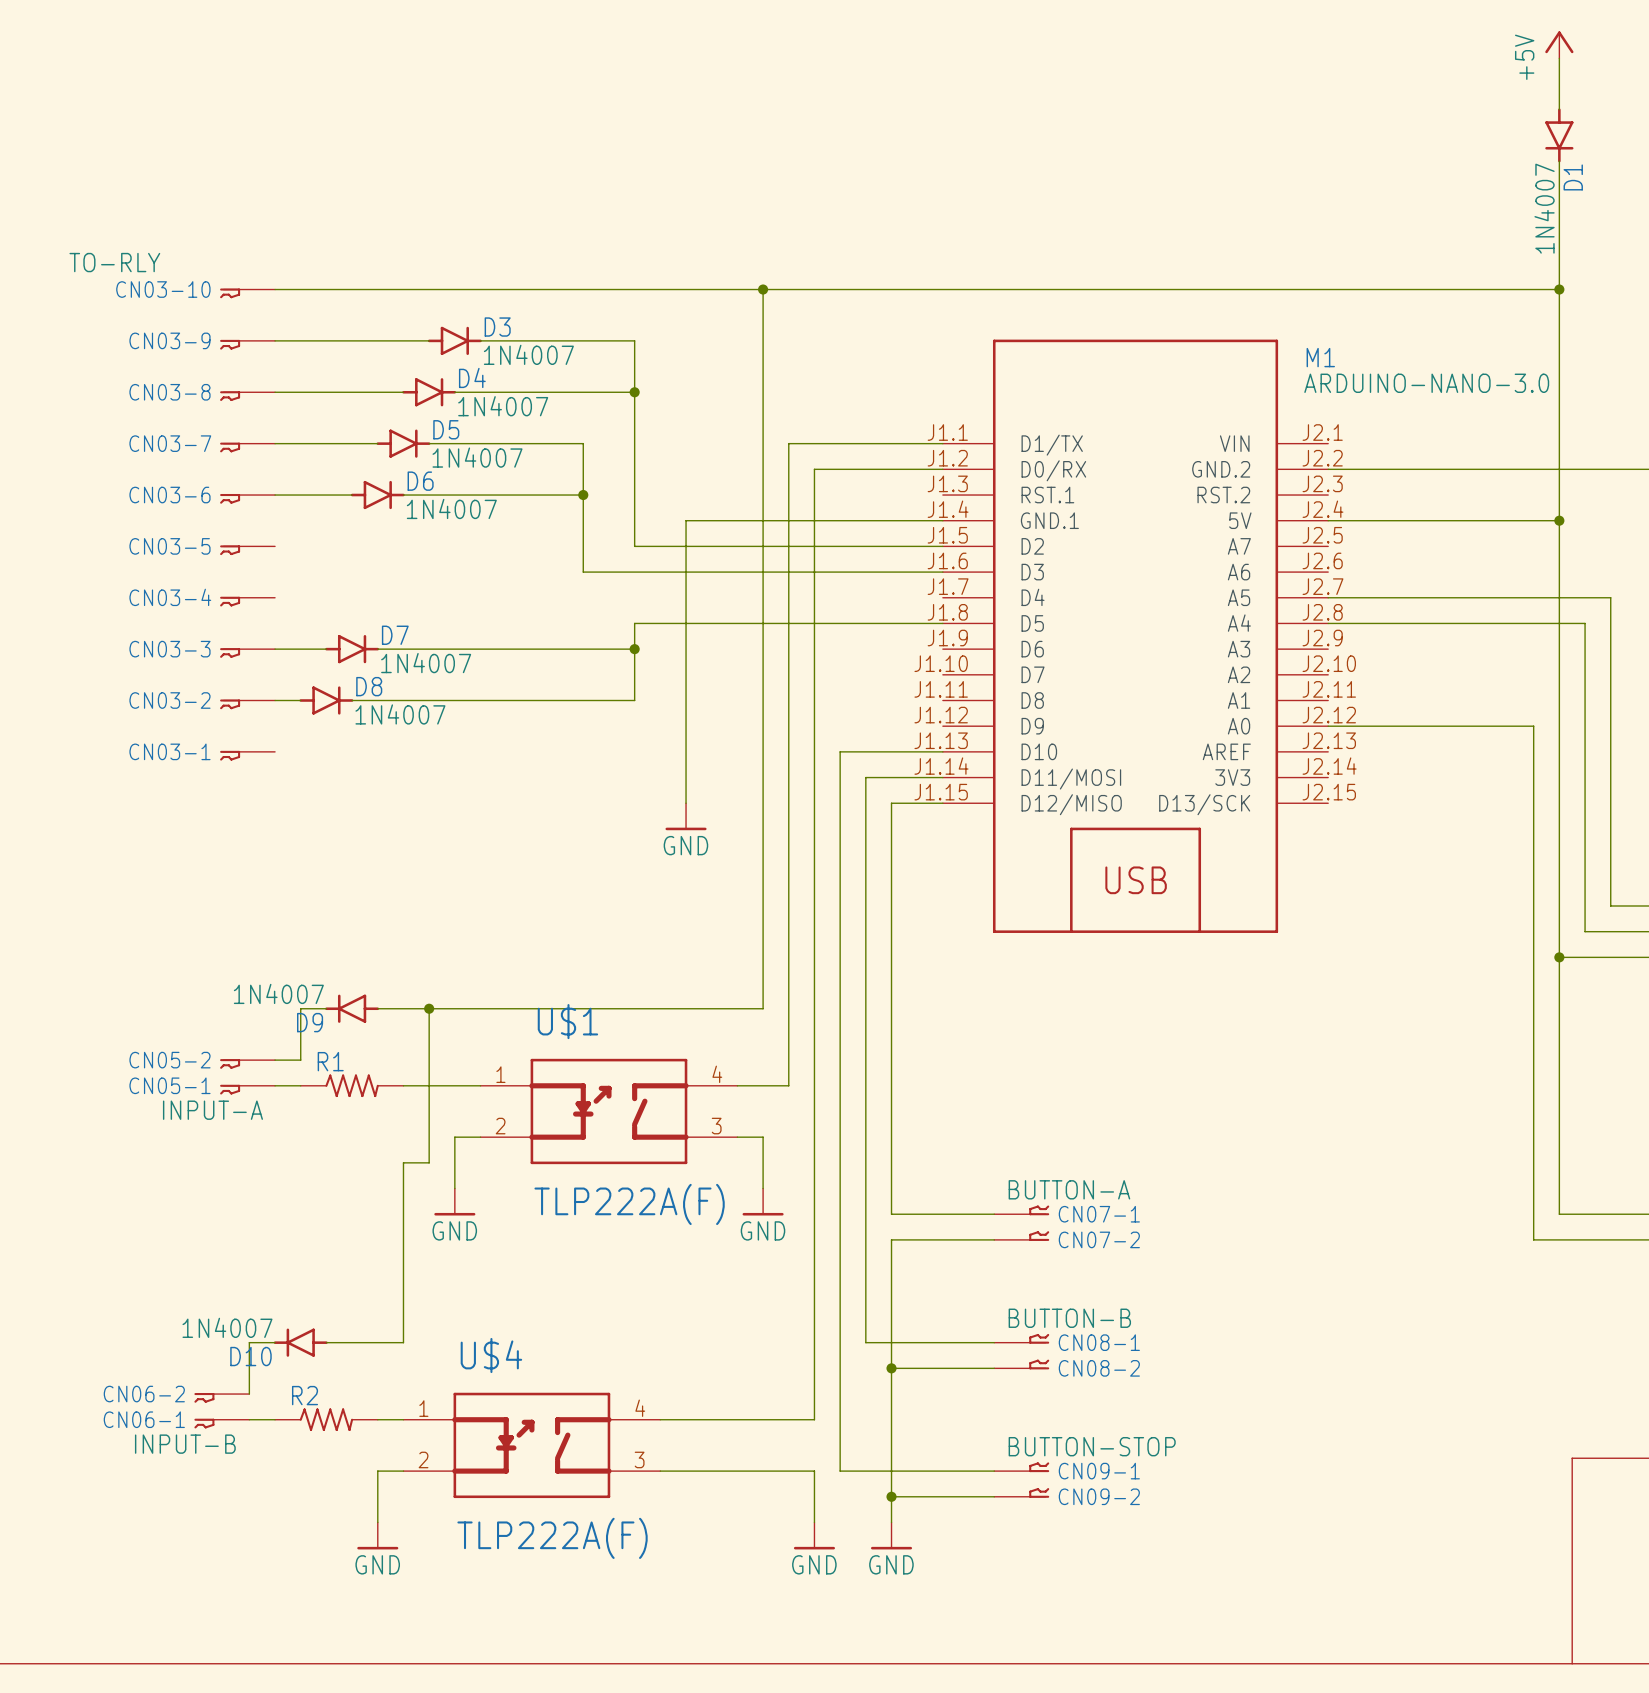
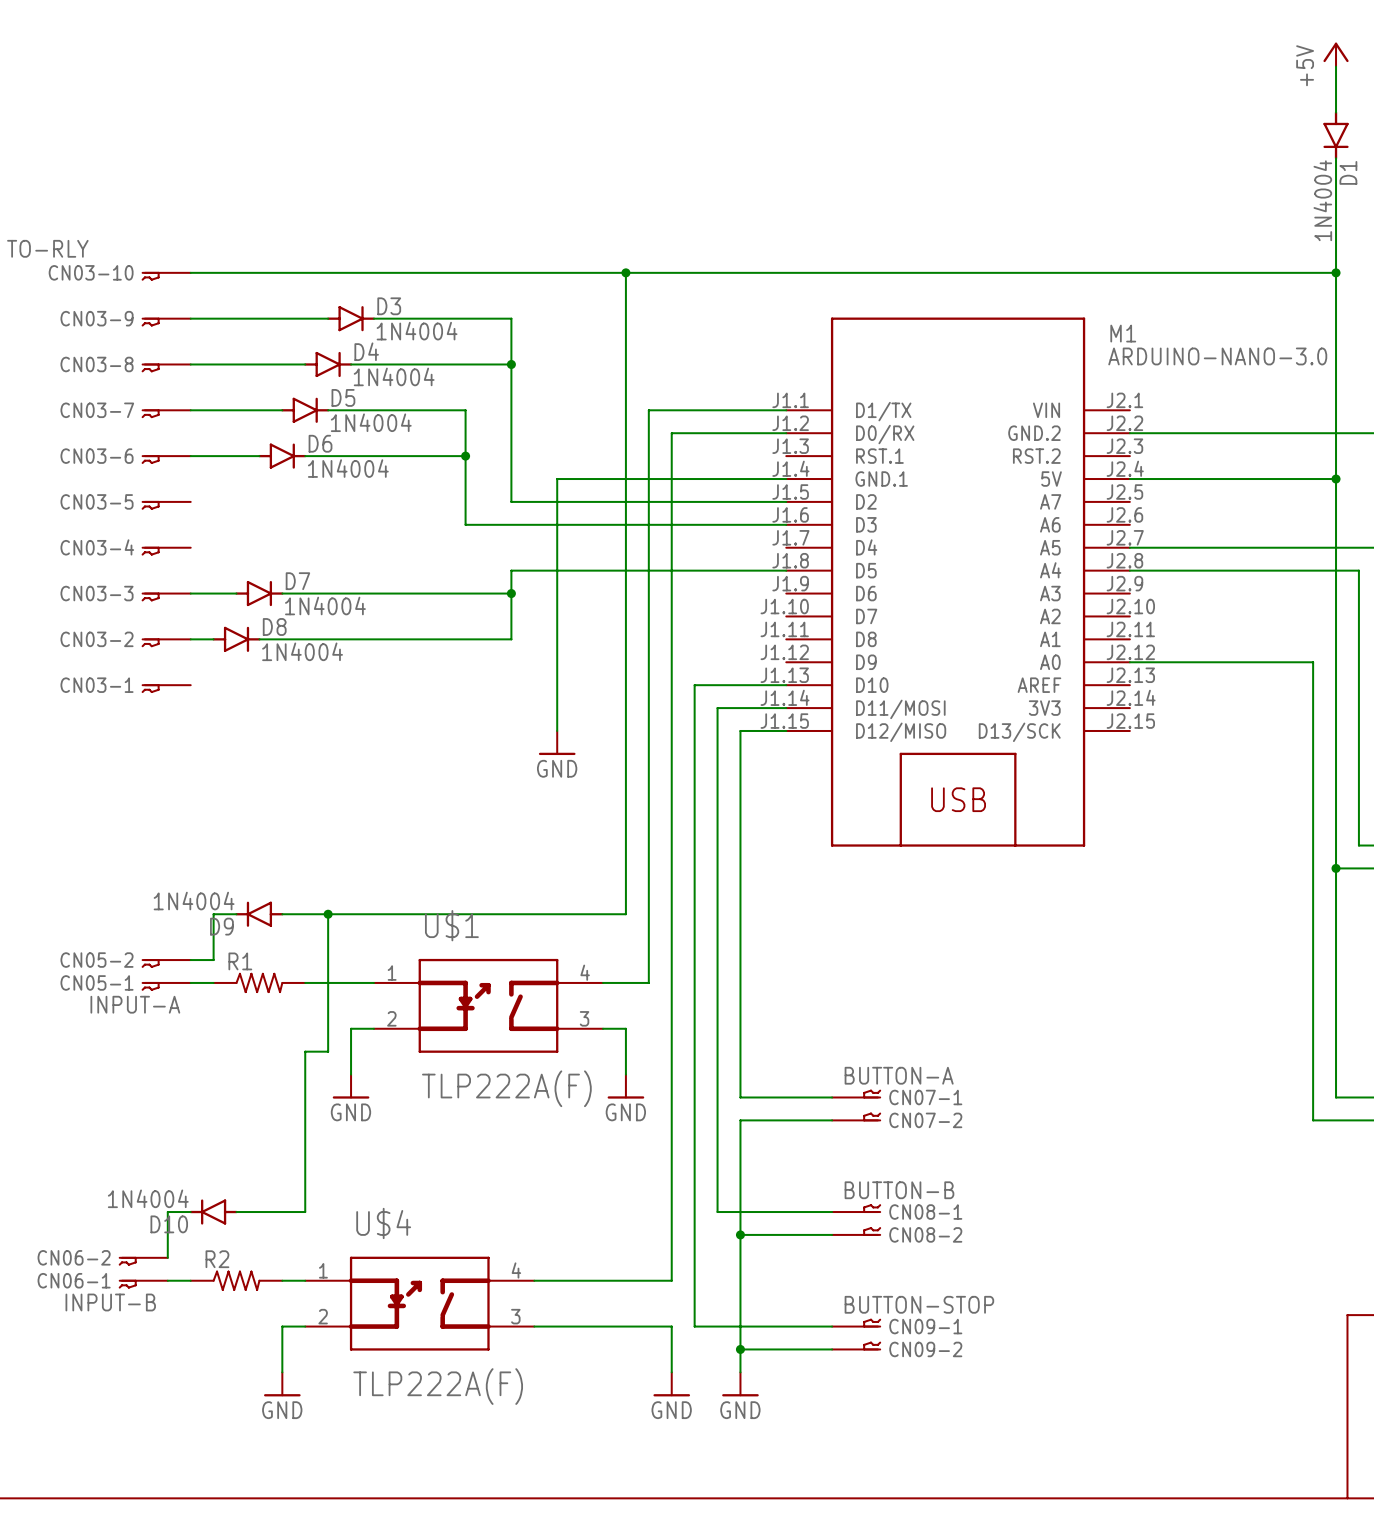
D1 value: 1N4007 (1544, 208) -> 1N4004 (1322, 200)
D3 value: 1N4007 (528, 354) -> 1N4004 (417, 331)
D4 value: 1N4007 (503, 406) -> 1N4004 (394, 376)
D5 value: 1N4007 (477, 457) -> 1N4004 (371, 422)
D6 value: 1N4007 (451, 508) -> 1N4004 (348, 468)
D7 value: 1N4007 (426, 663) -> 1N4004 (325, 605)
D8 value: 1N4007 (400, 714) -> 1N4004 (302, 651)
D9 value: 1N4007 (278, 993) -> 1N4004 (194, 901)
D10 value: 1N4007 (227, 1327) -> 1N4004 (148, 1198)

